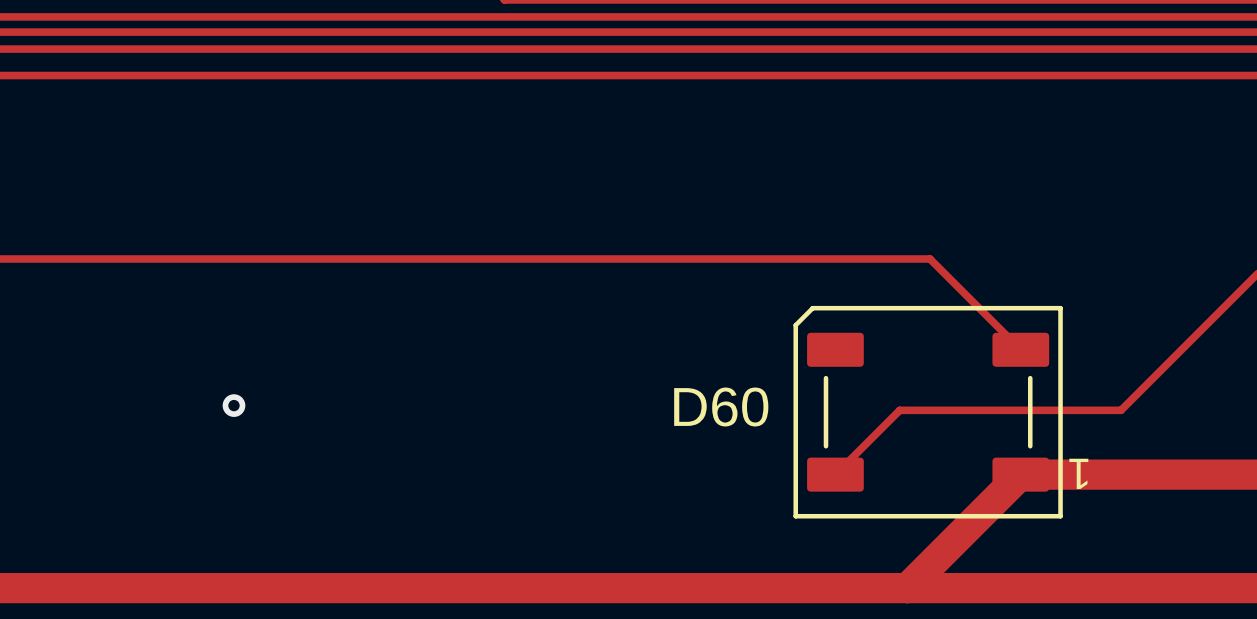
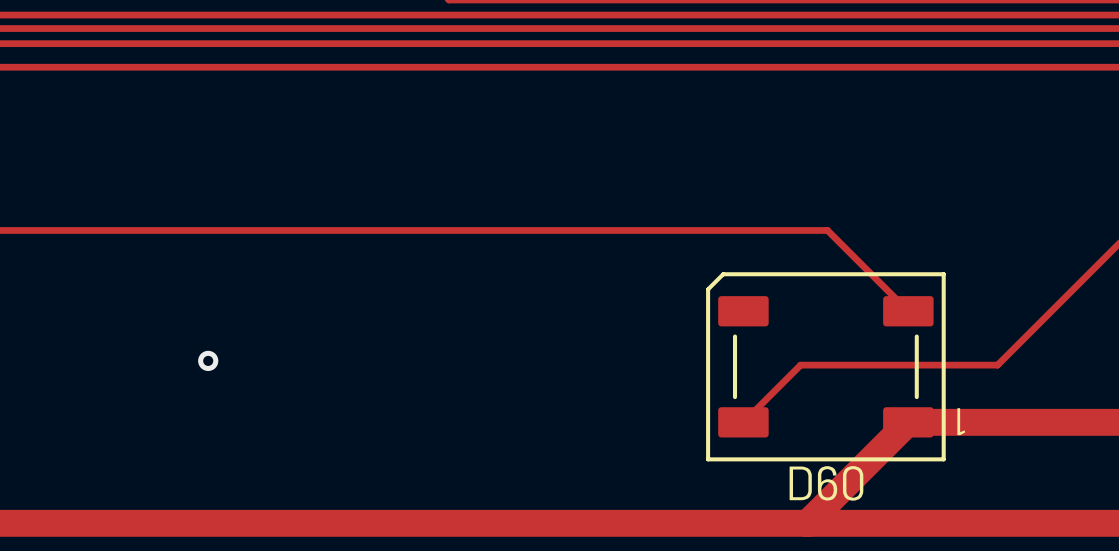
D60 name position: D60 (721, 407) -> D60 (826, 483)

